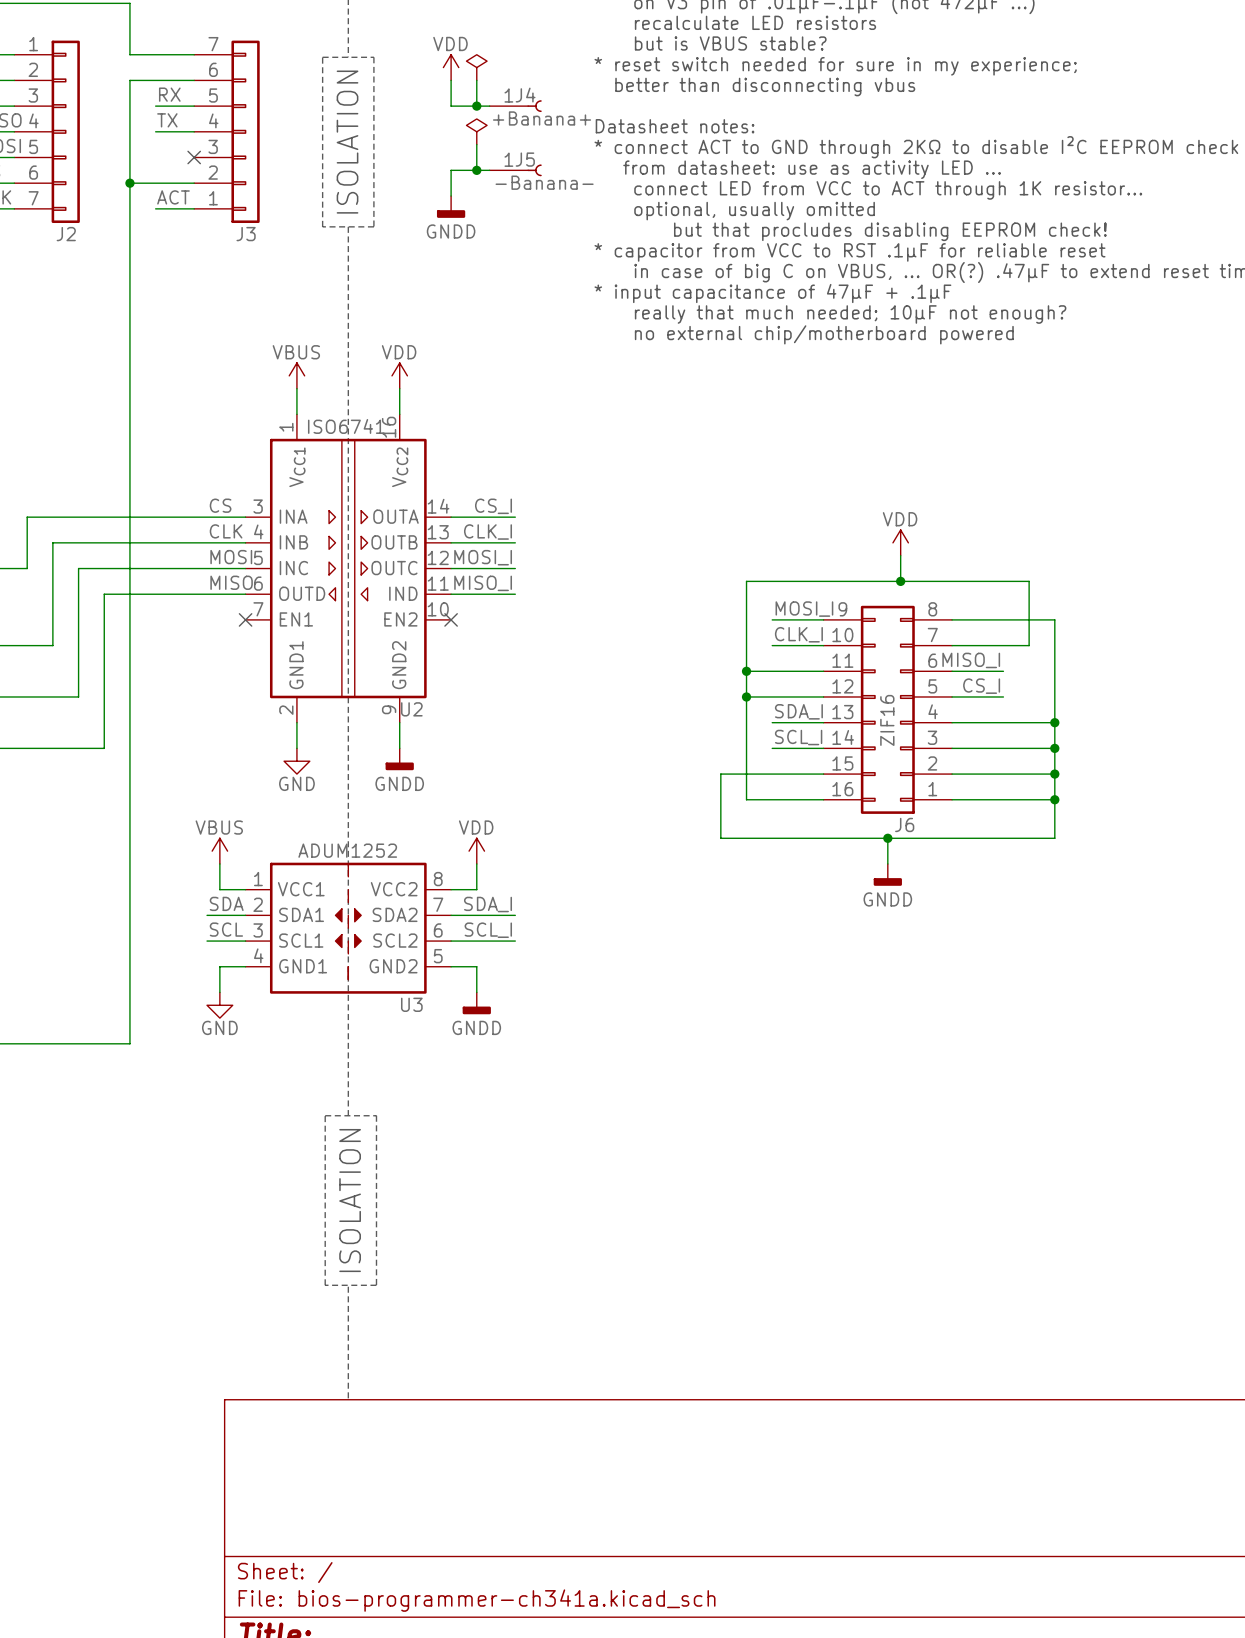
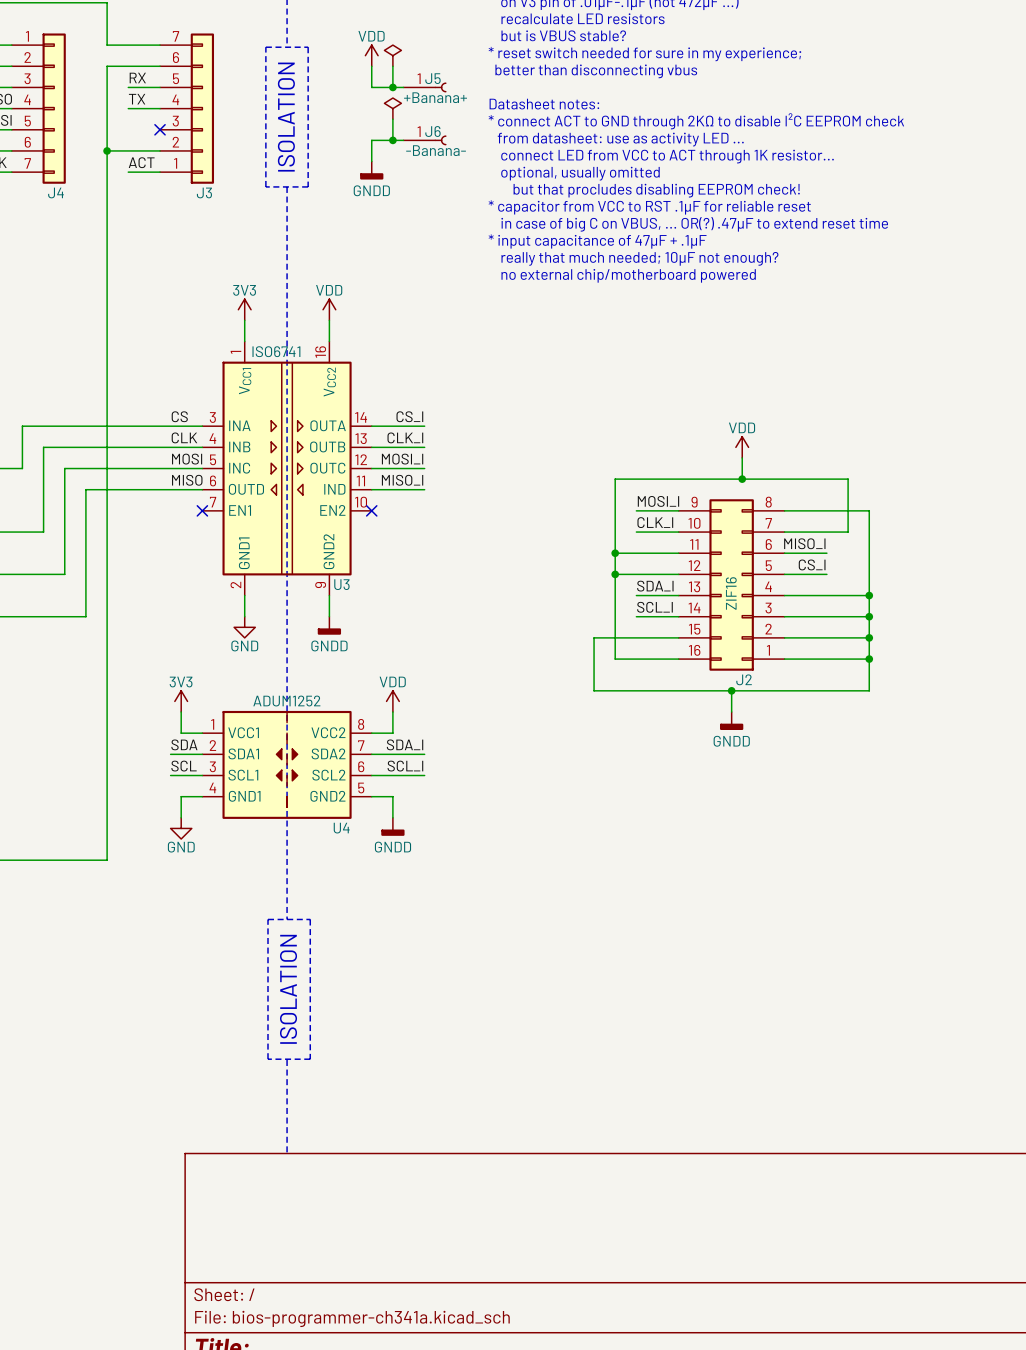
J4 name: J4 (525, 95) -> J5 (432, 78)
J5 name: J5 (525, 159) -> J6 (432, 131)
J2 name: J2 (66, 234) -> J4 (55, 192)
power symbol: VBUS (296, 375) -> 3V3 (244, 309)
U2 name: U2 (411, 709) -> U3 (341, 584)
J6 name: J6 (904, 824) -> J2 (744, 679)
power symbol: VBUS (219, 851) -> 3V3 (181, 701)
U3 name: U3 (411, 1004) -> U4 (341, 828)

